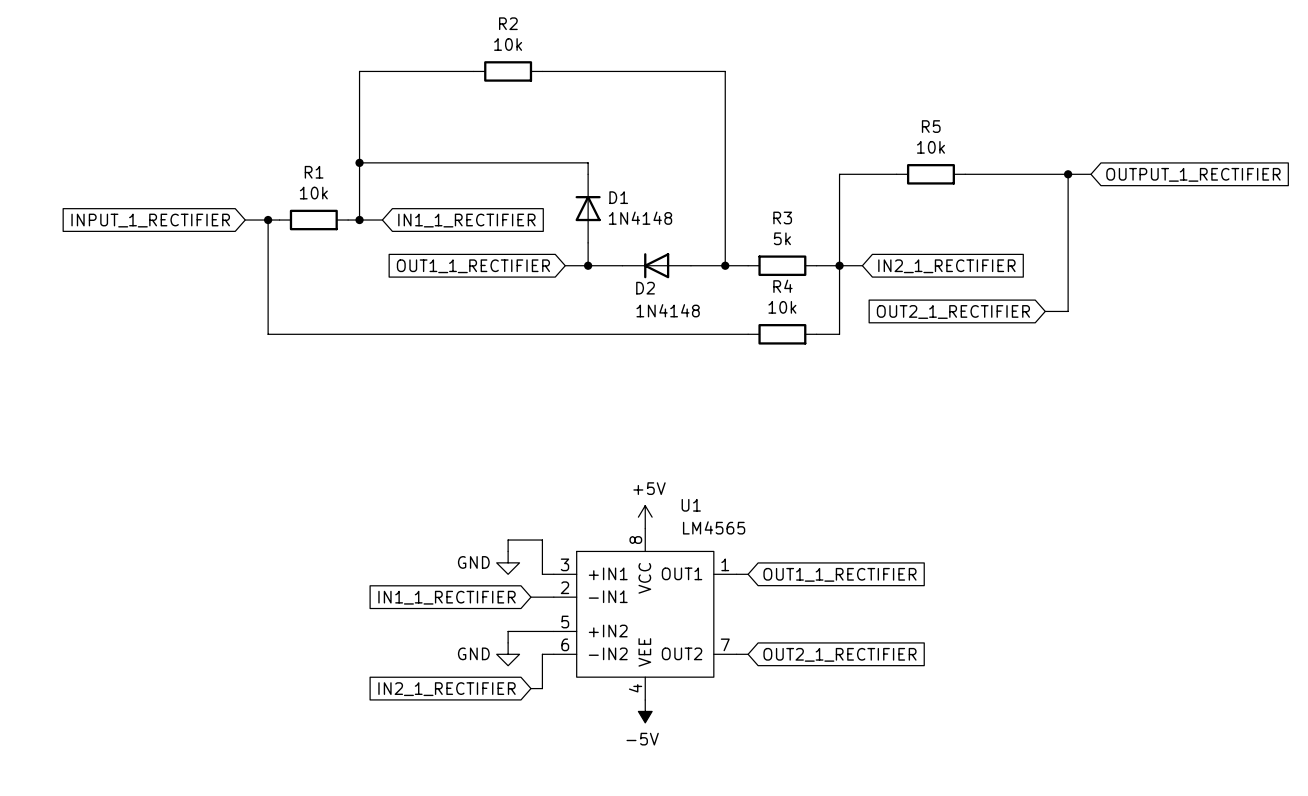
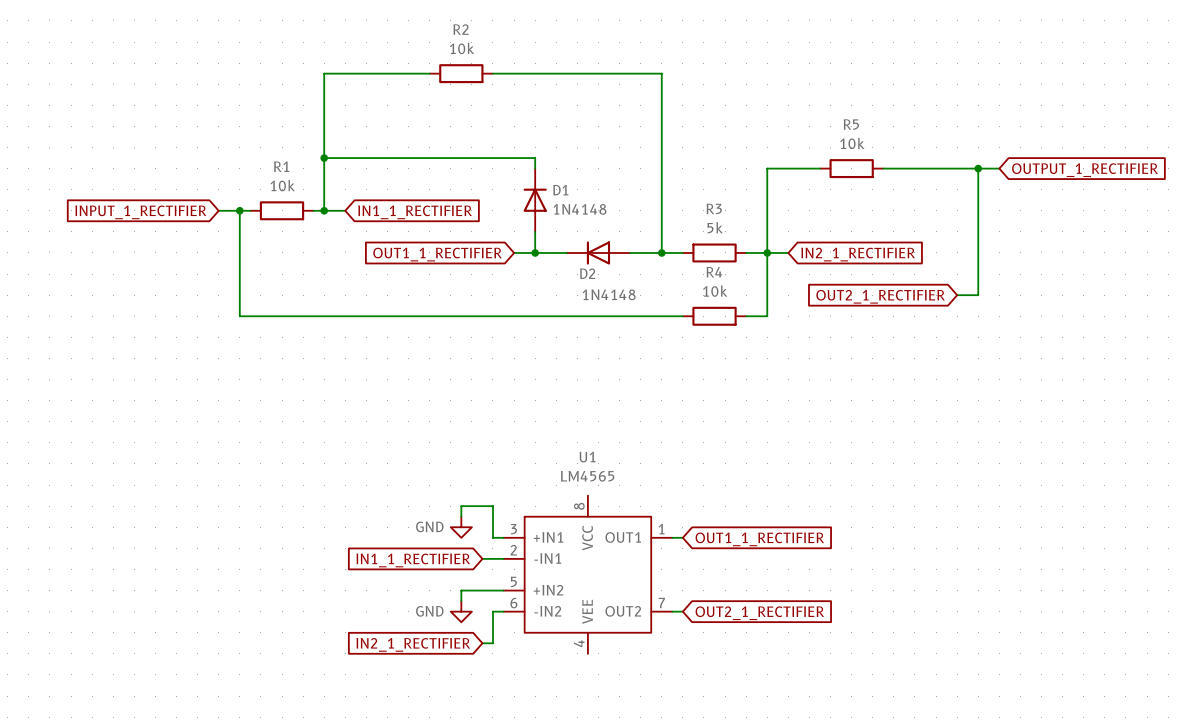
U1 name position: U1 (691, 505) -> U1 (587, 457)
power symbol: +5V (645, 517) -> none
U1 value position: LM4565 (714, 527) -> LM4565 (587, 476)
power symbol: -5V (645, 711) -> none

